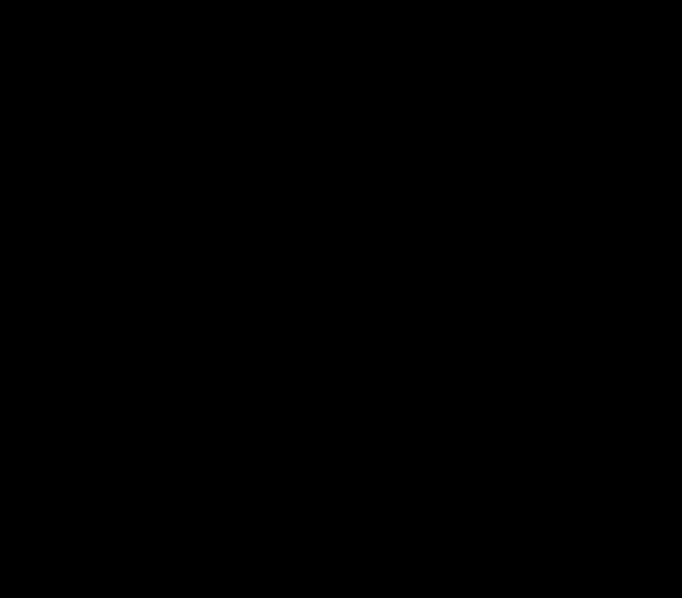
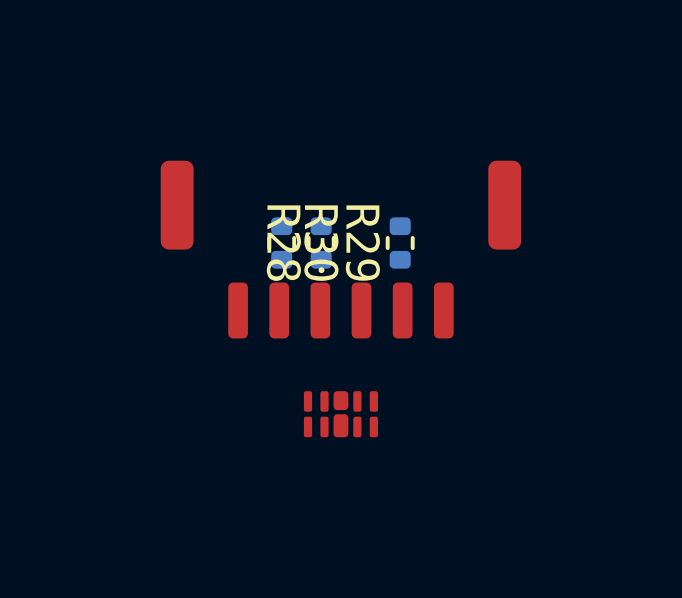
R30: none -> (281, 243)
R28: none -> (321, 243)
R29: none -> (400, 243)
part: none -> (340, 249)
part: none -> (340, 414)

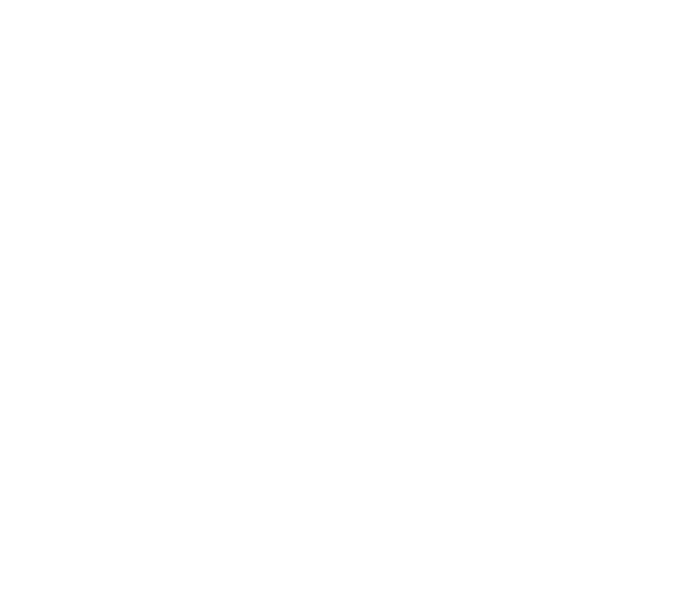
R30: (281, 243) -> none
R28: (321, 243) -> none
R29: (400, 243) -> none
part: (340, 249) -> none
part: (340, 414) -> none

